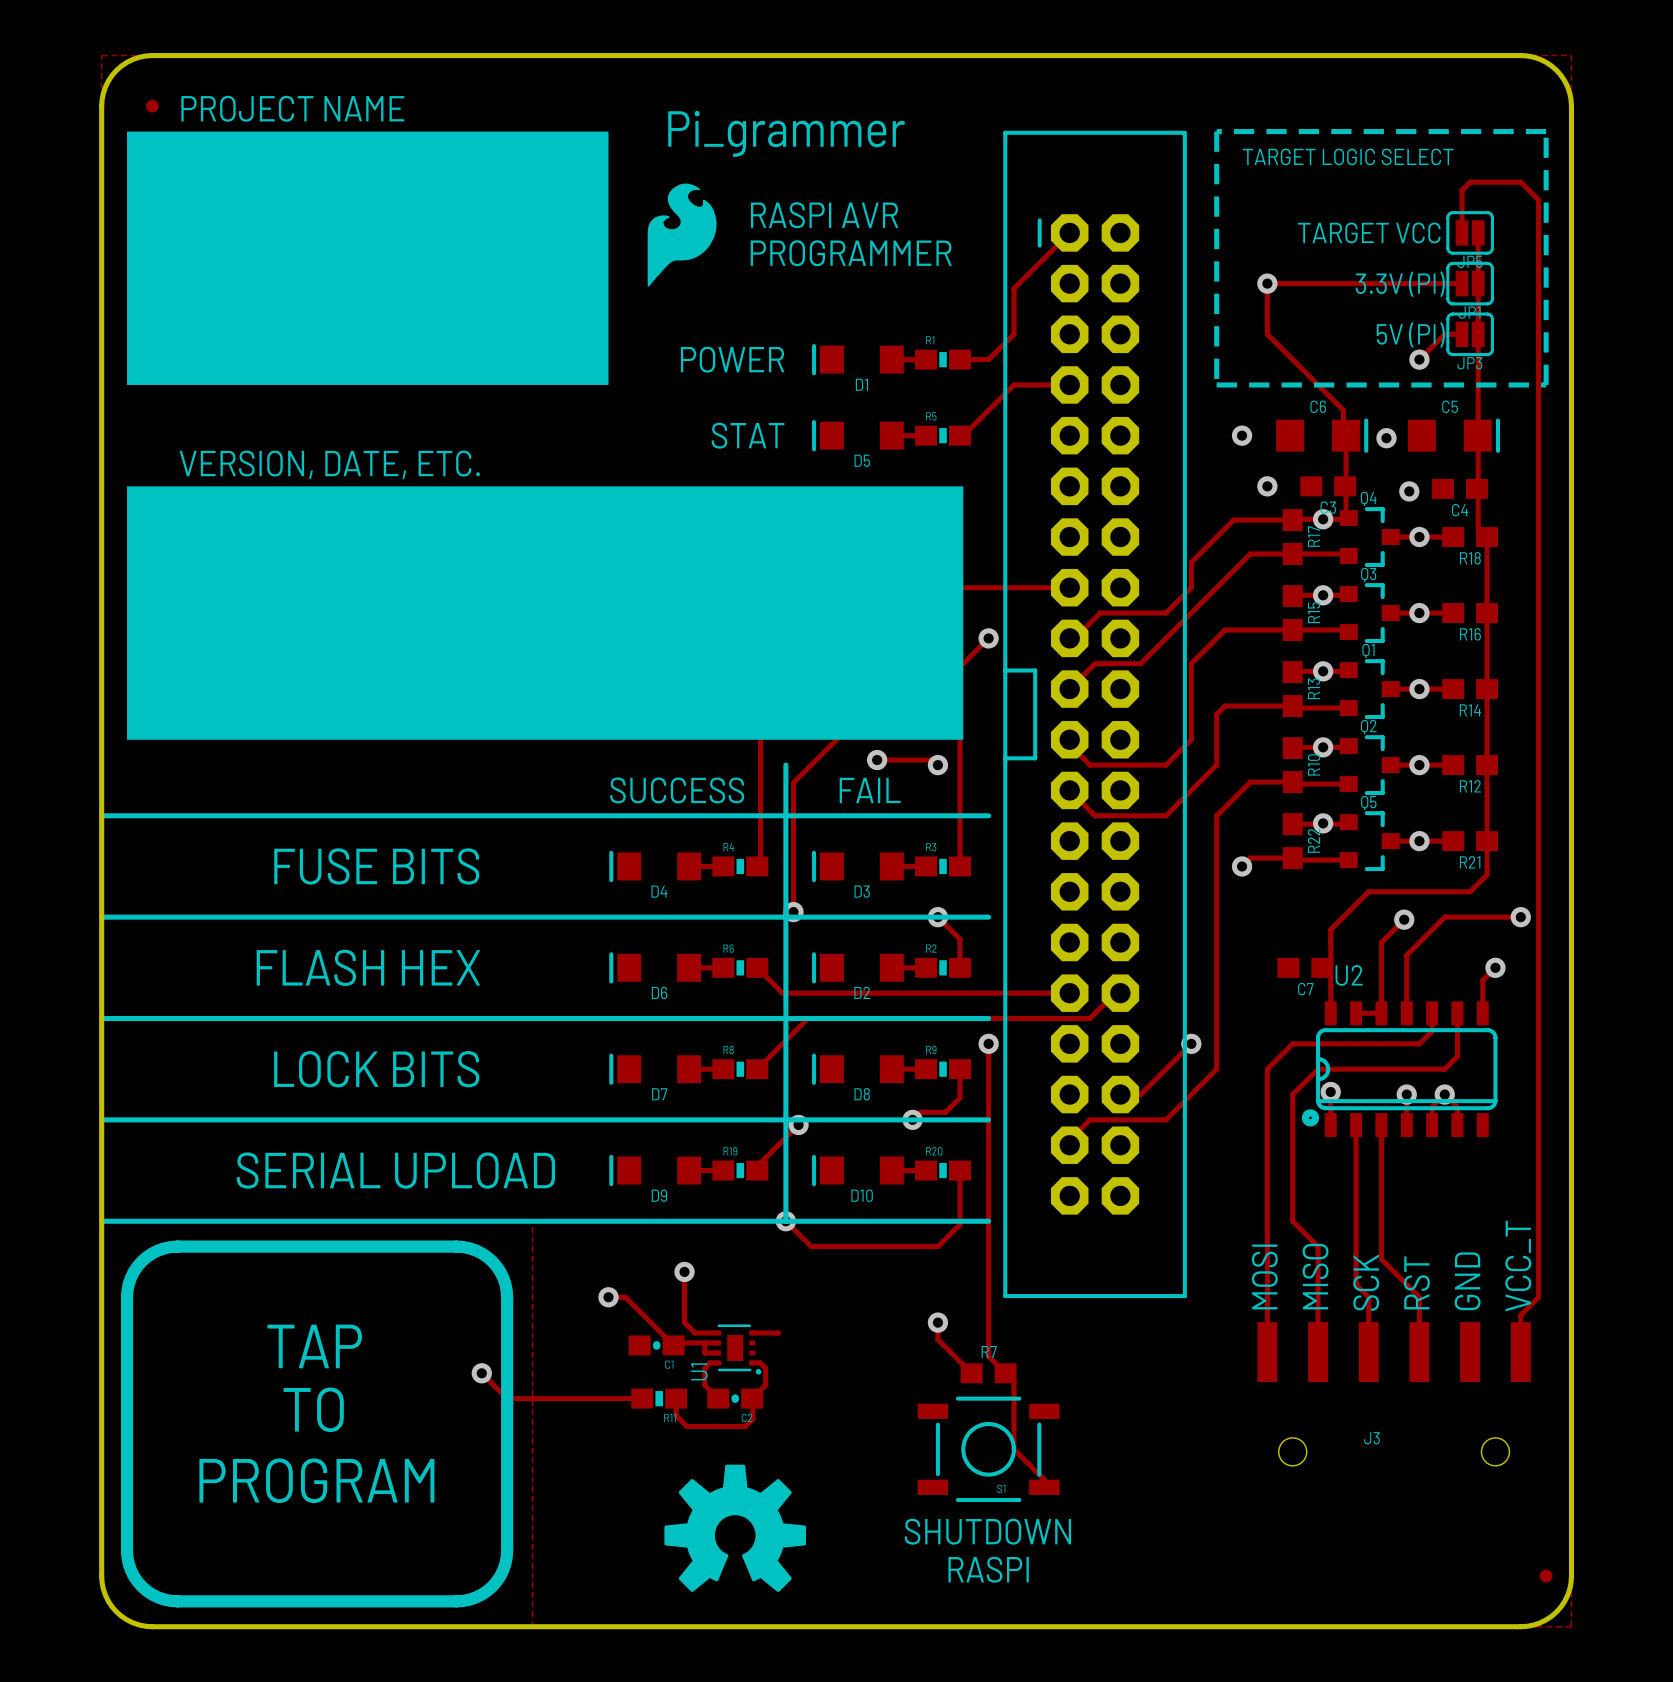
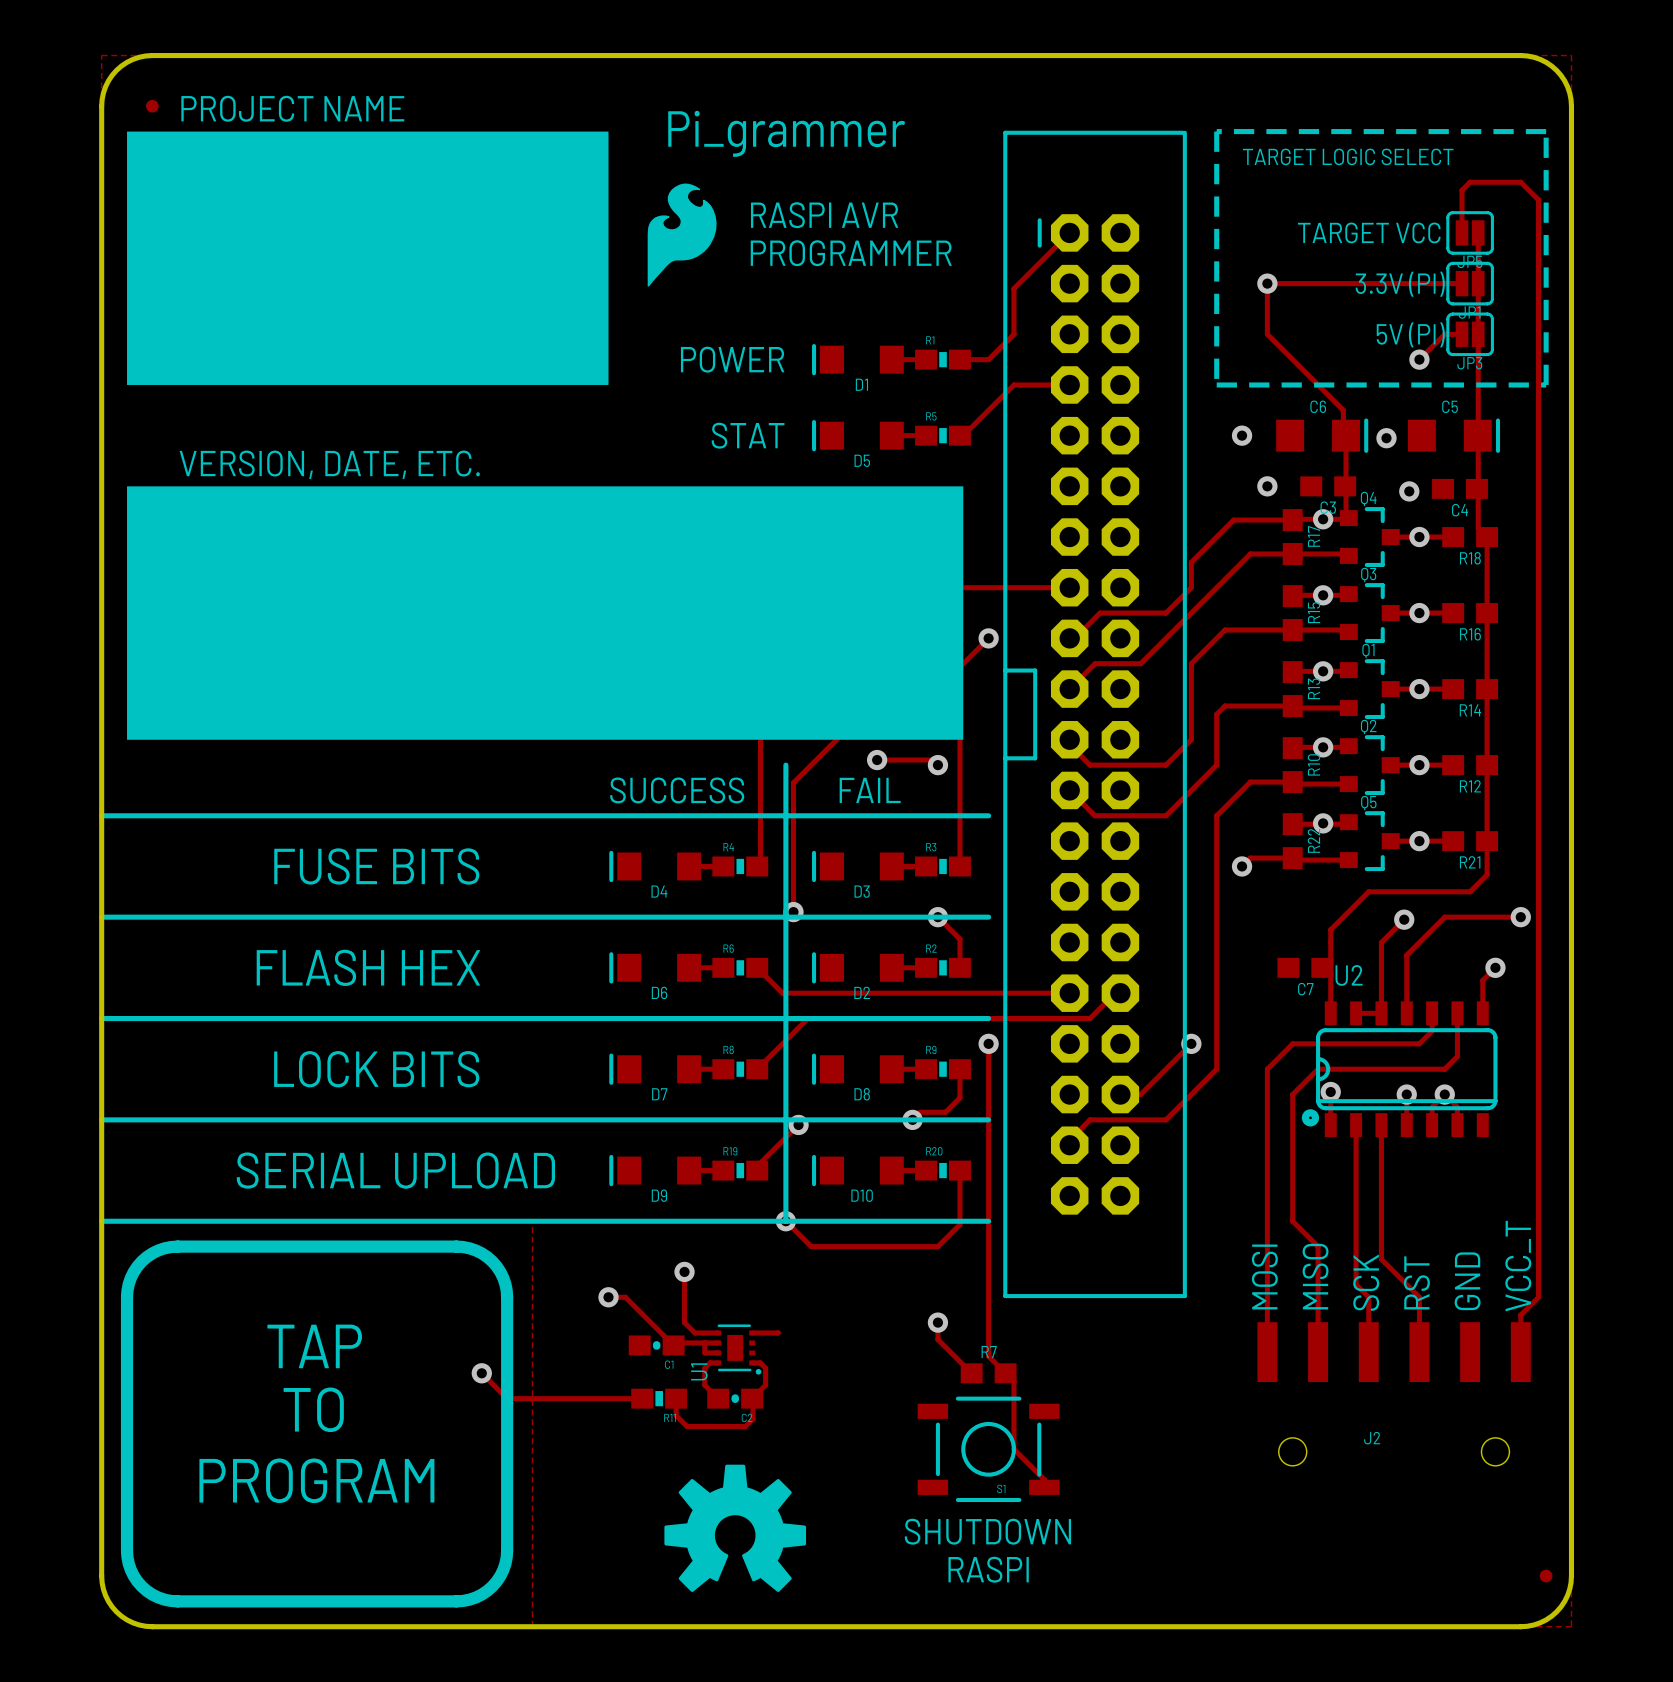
J3 name: J3 (1371, 1438) -> J2 (1372, 1438)

